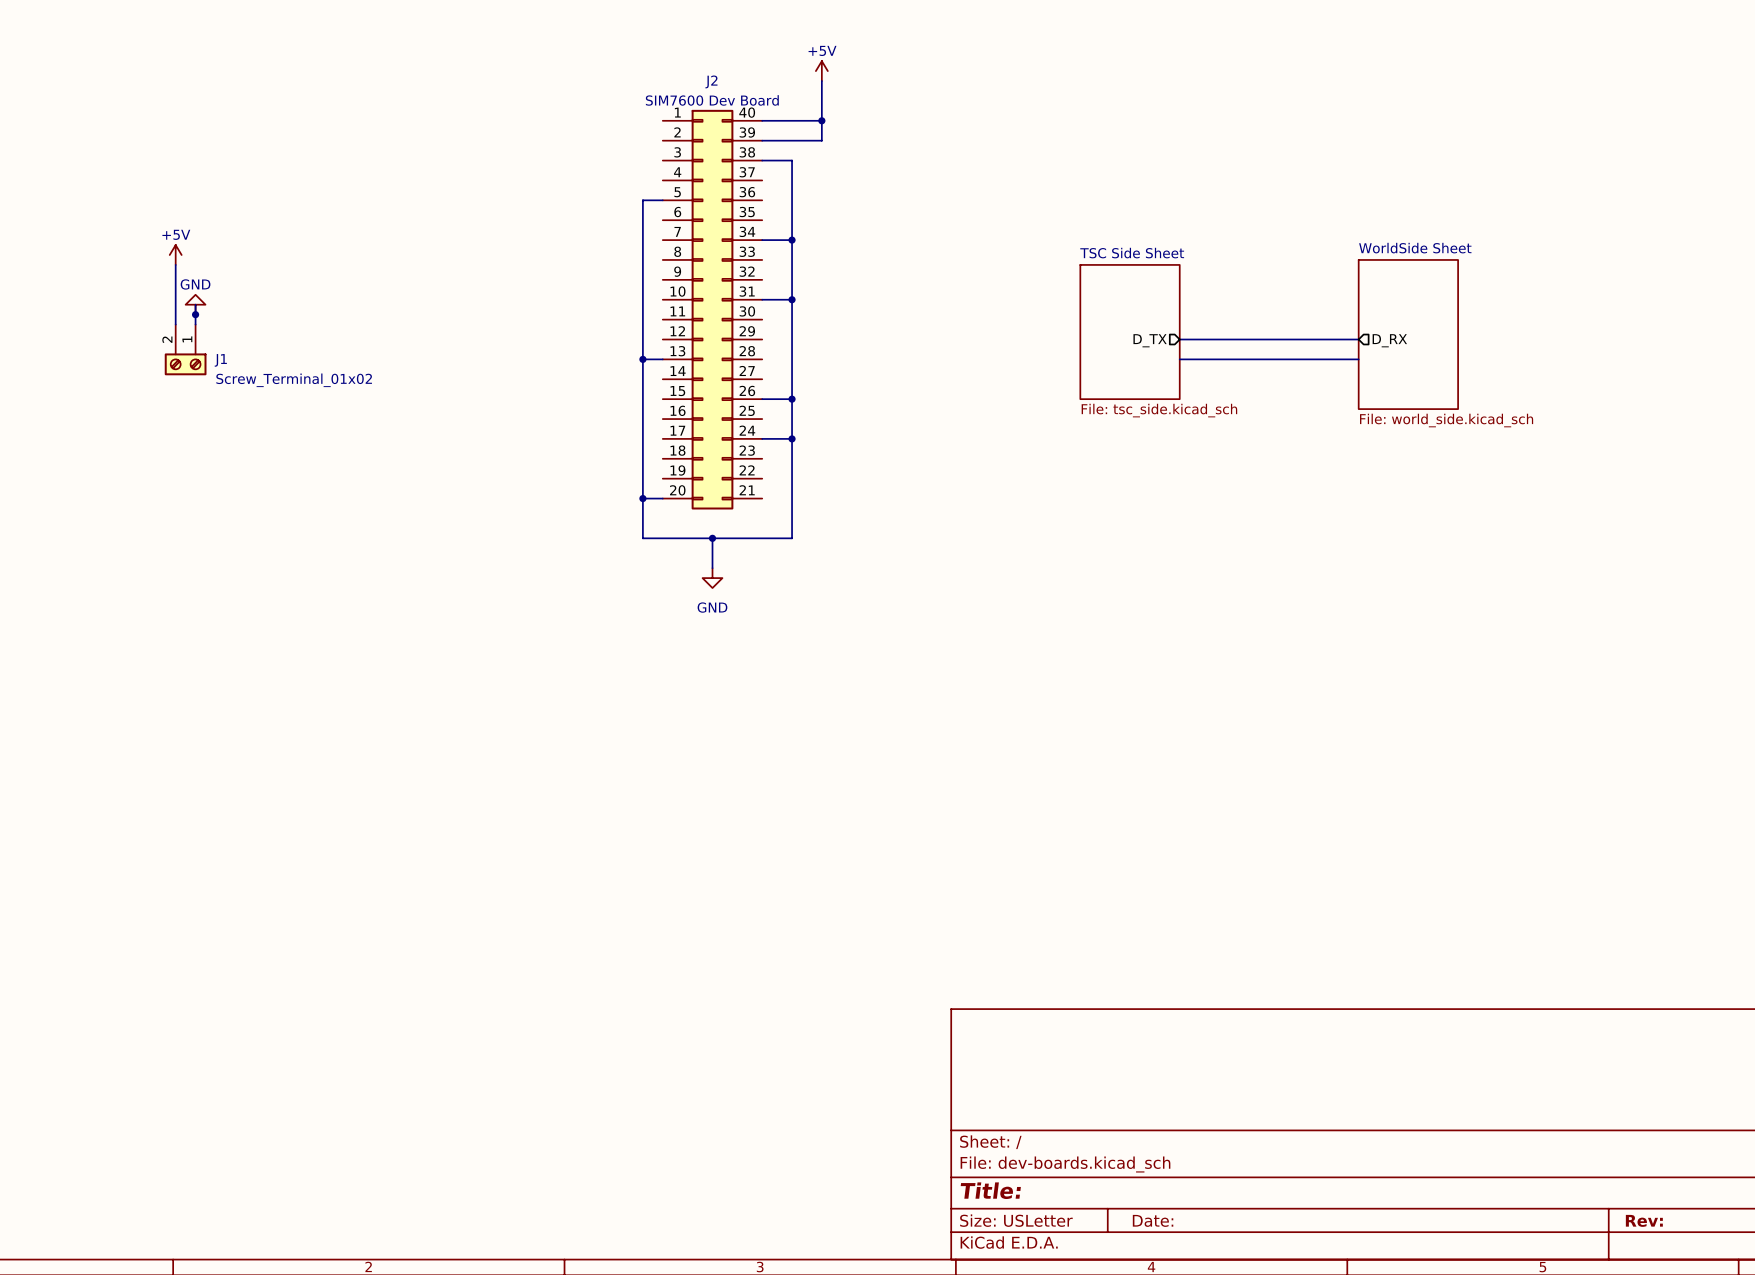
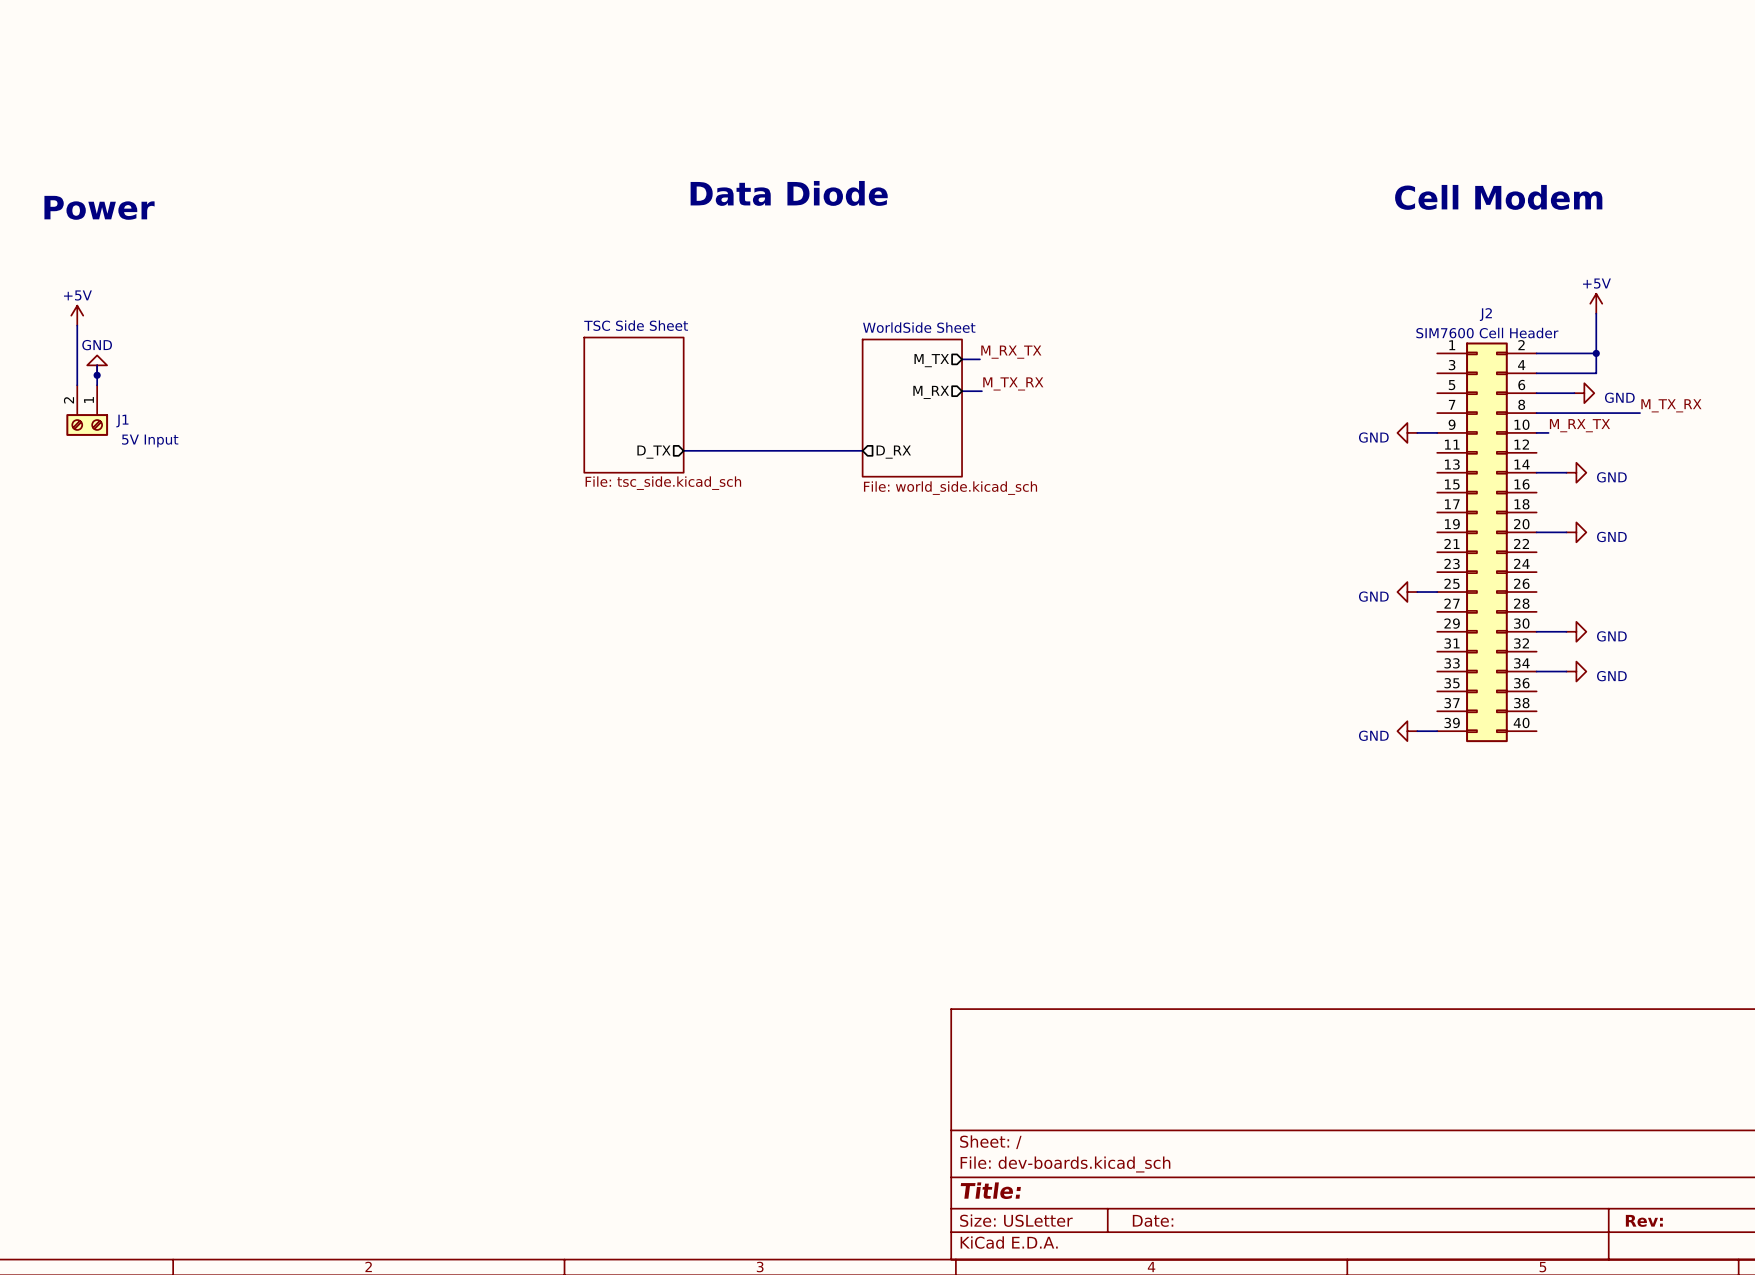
power symbol: +5V (821, 71) -> none
wire: (821, 81) (821, 140) (762, 140) -> none
J2 value: SIM7600 Dev Board (712, 100) -> SIM7600 Cell Header (1487, 333)
J2 symbol: [662, 109, 763, 510] -> [1437, 342, 1537, 743]
wire: (762, 120) (821, 120) -> none
junction: (821, 120) -> none
wire: (762, 160) (792, 160) (792, 538) (642, 538) (642, 200) (662, 200) -> none
text: none -> Data Diode (789, 193)
text: none -> Cell Modem (1498, 197)
text: none -> Power (99, 207)
wire: (762, 240) (792, 240) -> none
junction: (792, 240) -> none
power symbol position: +5V (175, 255) -> +5V (77, 315)
wire: (175, 264) (175, 324) -> (77, 325) (77, 385)
wire: (762, 299) (792, 299) -> none
junction: (792, 299) -> none
power symbol: none -> +5V (1596, 303)
wire: (195, 304) (195, 324) -> (97, 365) (97, 385)
power symbol position: GND (195, 304) -> GND (97, 365)
wire: none -> (1596, 313) (1596, 373) (1536, 373)
junction: (195, 314) -> none
sheet TSC Side Sheet: File: tsc_side.kicad_sch (1130, 332) -> none
sheet WorldSide Sheet: File: world_side.kicad_sch (1408, 334) -> none
wire: (1179, 339) (1358, 339) -> none
sheet pin: D_TX (1150, 340) -> none
sheet pin: D_RX (1389, 340) -> none
J1 position: (185, 349) -> (87, 410)
label: none -> M_RX_TX (1011, 352)
wire: none -> (1536, 353) (1596, 353)
junction: none -> (1596, 353)
wire: (642, 359) (662, 359) -> none
junction: (642, 359) -> none
wire: none -> (962, 359) (979, 359)
wire: (1179, 359) (1358, 359) -> none
sheet pin: none -> M_TX (931, 360)
junction: none -> (97, 375)
J1 value: Screw_Terminal_01x02 (294, 380) -> 5V Input (150, 440)
label: none -> M_TX_RX (1013, 383)
wire: none -> (962, 391) (981, 391)
sheet pin: none -> M_RX (931, 392)
wire: none -> (1536, 393) (1574, 393)
power symbol: none -> GND (1584, 393)
wire: (762, 399) (792, 399) -> none
junction: (792, 399) -> none
sheet TSC Side Sheet: none -> File: tsc_side.kicad_sch (633, 405)
label: none -> M_TX_RX (1671, 405)
sheet WorldSide Sheet: none -> File: world_side.kicad_sch (912, 408)
wire: none -> (1536, 413) (1640, 413)
label: none -> M_RX_TX (1579, 425)
power symbol: none -> GND (1407, 432)
wire: none -> (1417, 432) (1437, 432)
wire: none -> (1536, 432) (1548, 432)
wire: (762, 438) (792, 438) -> none
junction: (792, 438) -> none
wire: none -> (683, 450) (862, 450)
sheet pin: none -> D_TX (654, 452)
sheet pin: none -> D_RX (893, 452)
wire: none -> (1536, 472) (1566, 472)
power symbol: none -> GND (1576, 472)
wire: (642, 498) (662, 498) -> none
junction: (642, 498) -> none
wire: none -> (1536, 532) (1566, 532)
power symbol: none -> GND (1576, 532)
wire: (712, 538) (712, 568) -> none
junction: (712, 538) -> none
power symbol: GND (712, 578) -> none
power symbol: none -> GND (1407, 592)
wire: none -> (1417, 592) (1437, 592)
wire: none -> (1536, 631) (1566, 631)
power symbol: none -> GND (1576, 631)
wire: none -> (1536, 671) (1566, 671)
power symbol: none -> GND (1576, 671)
power symbol: none -> GND (1407, 731)
wire: none -> (1417, 731) (1437, 731)

